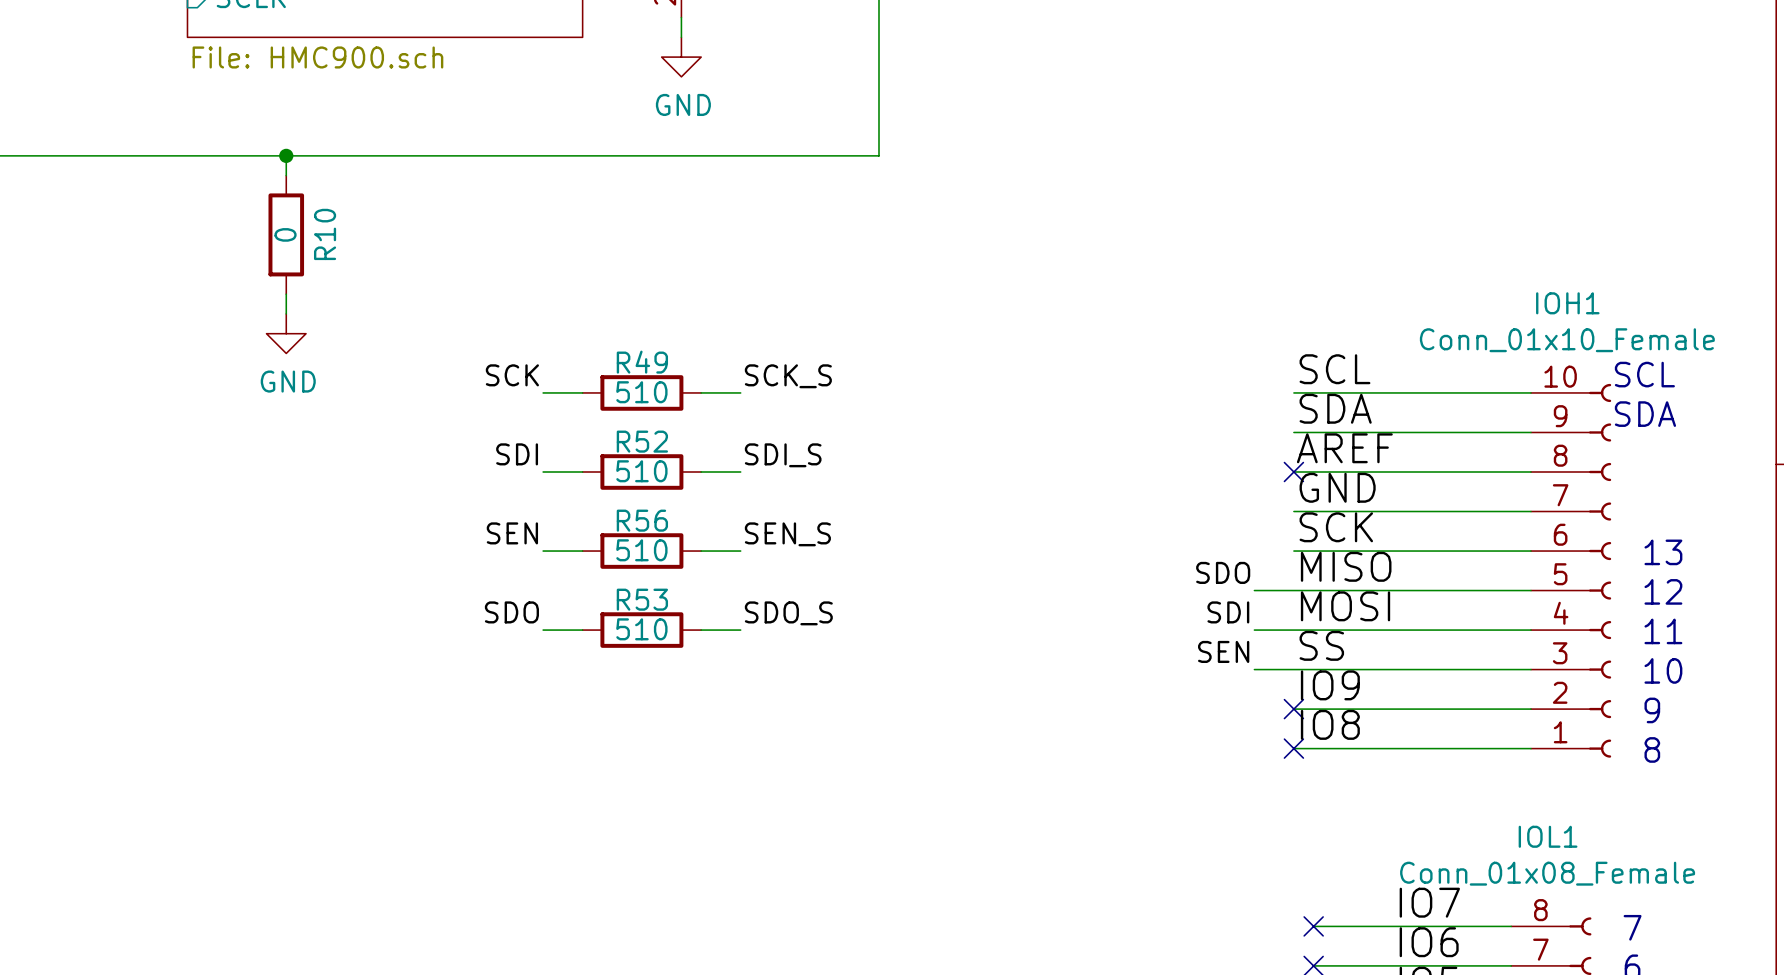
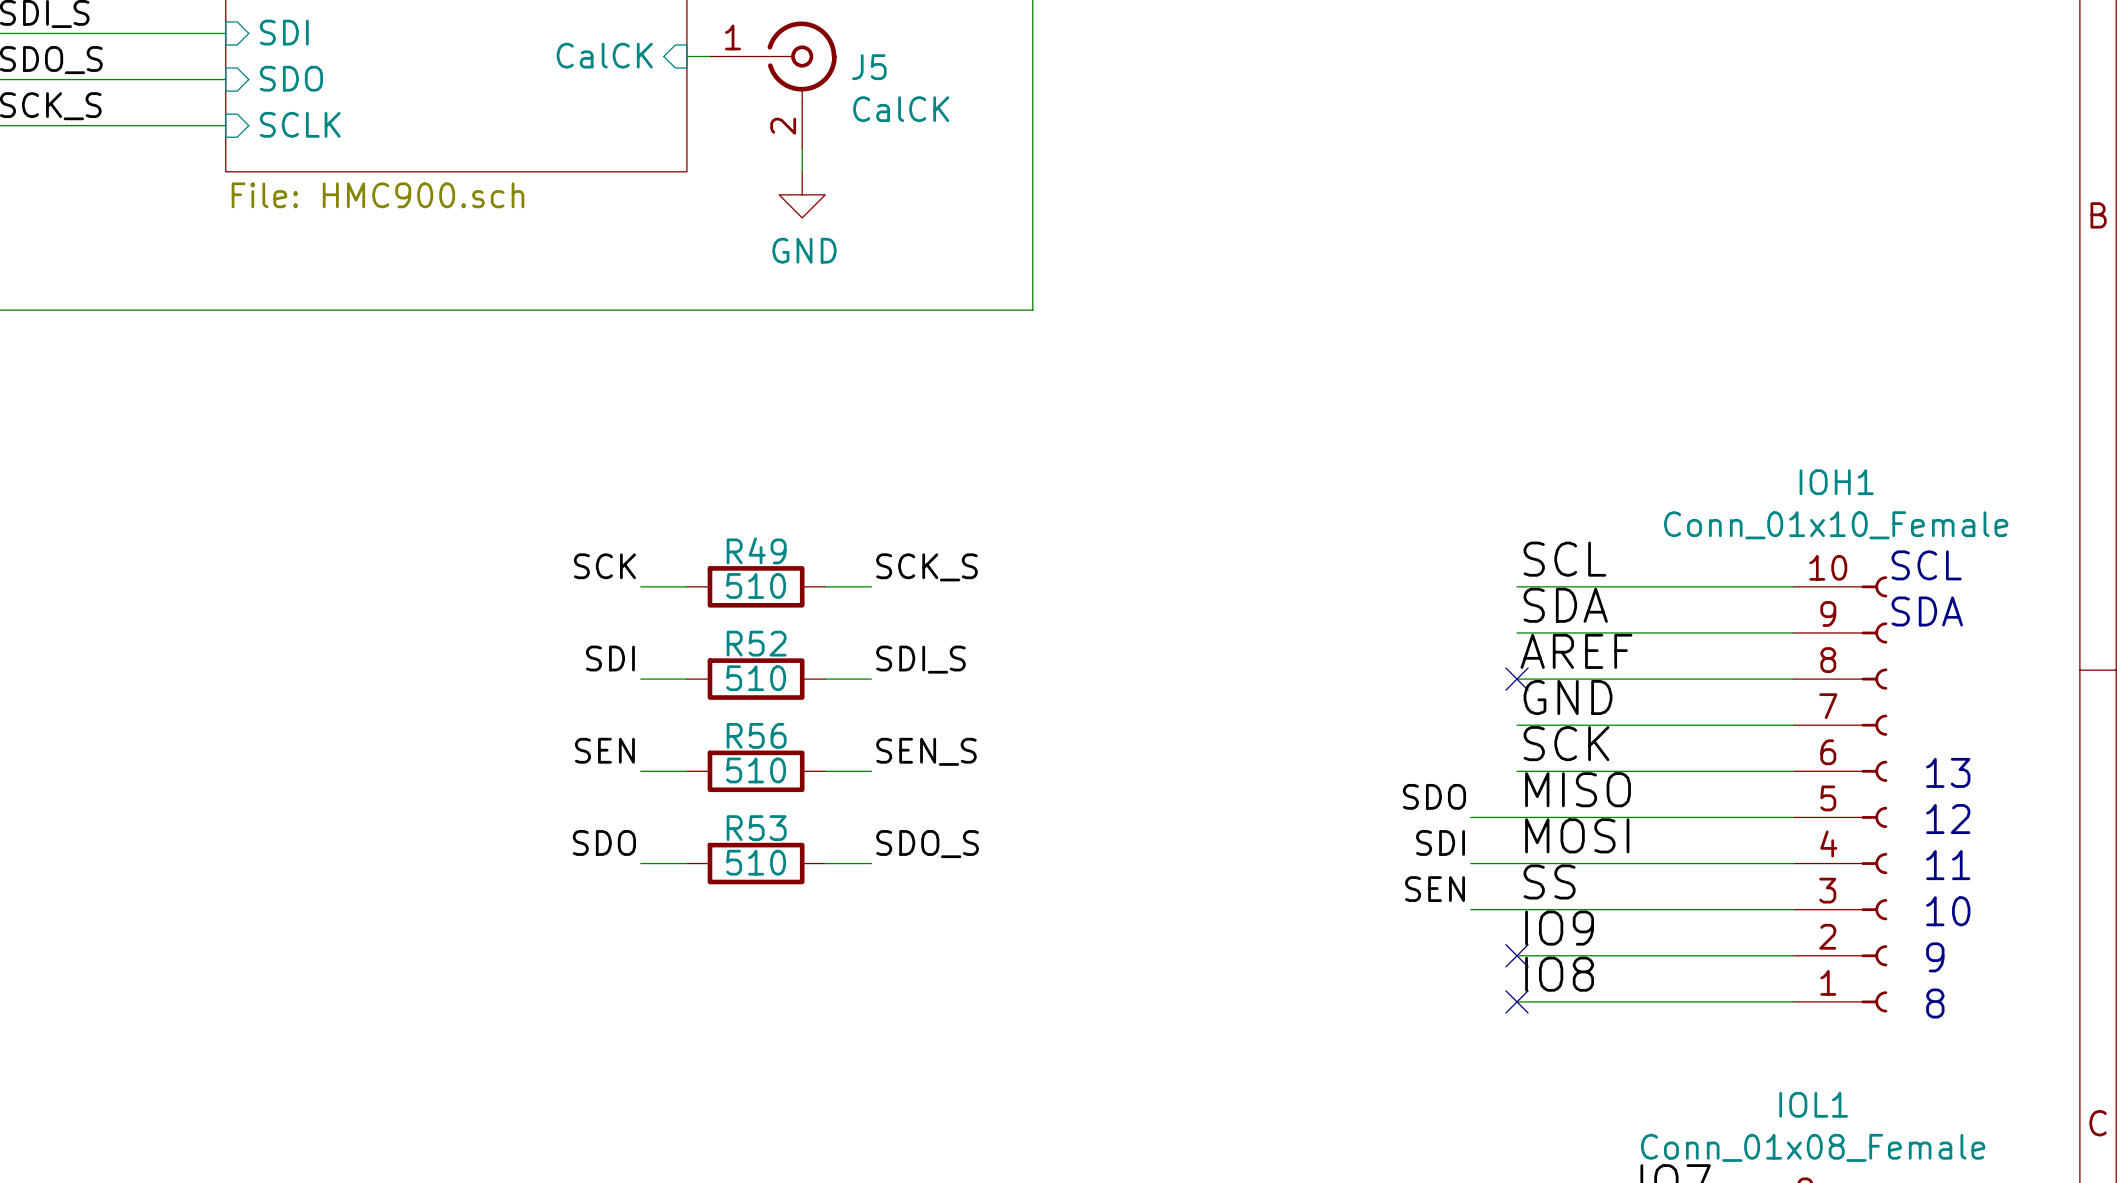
wire: (286, 155) (286, 175) -> none
junction: (286, 155) -> none
R10: 0 (286, 234) -> none
wire: (286, 294) (286, 313) -> none
power symbol: GND (286, 333) -> none

